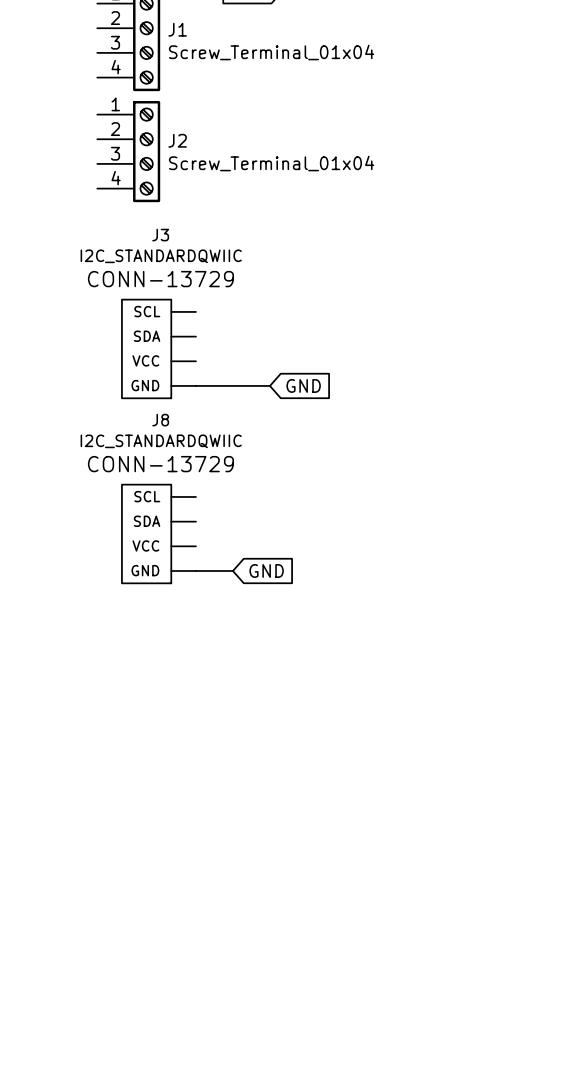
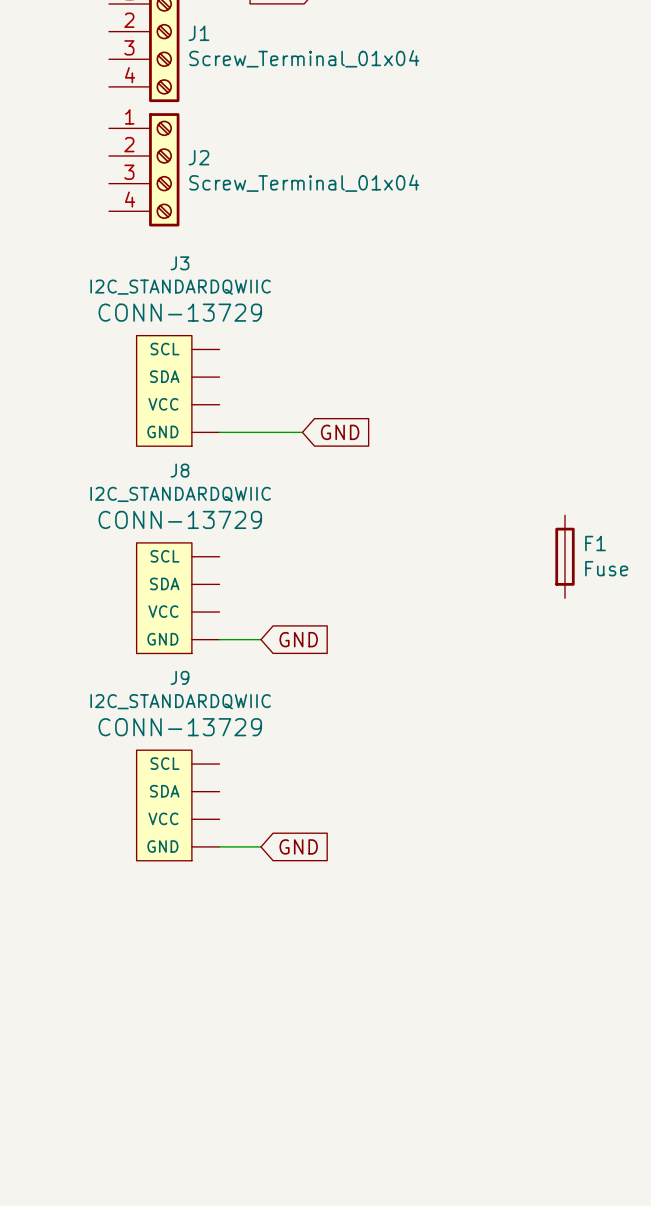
F1: none -> Fuse (564, 556)
J9: none -> I2C_STANDARDQWIIC (178, 805)
wire: none -> (219, 846) (260, 846)
global label: none -> GND (298, 846)

